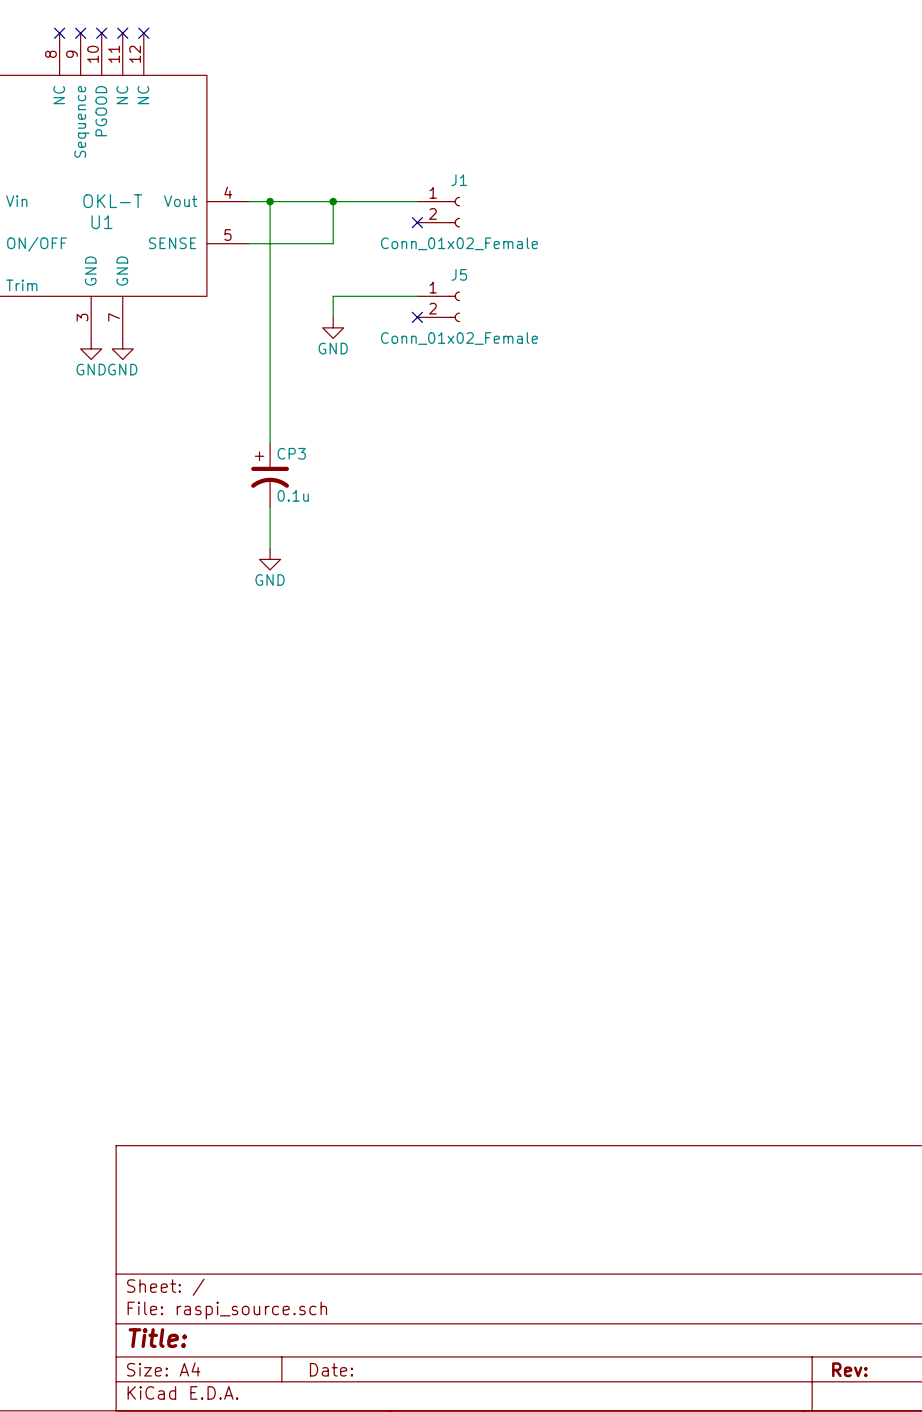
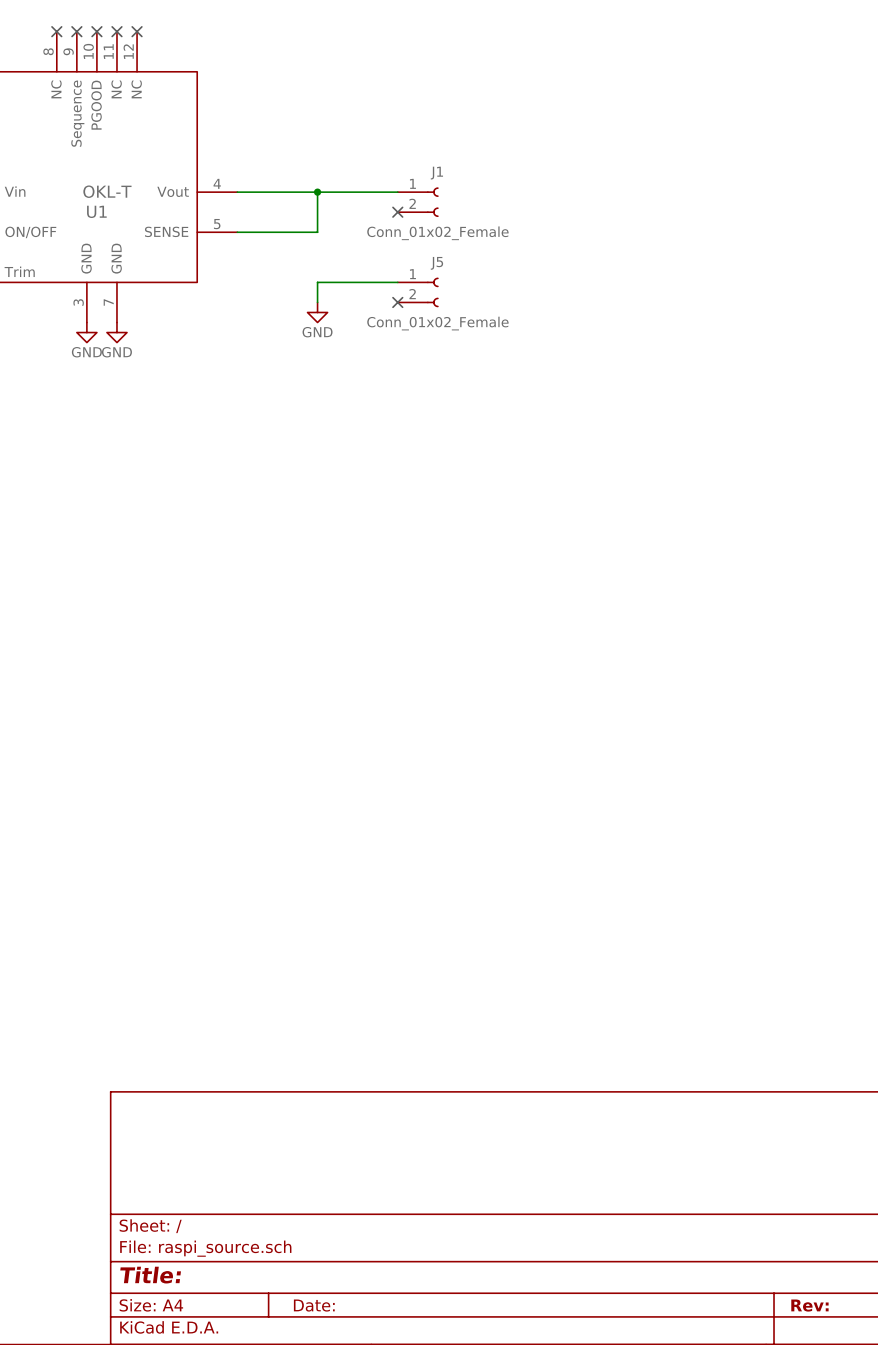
wire: (270, 201) (270, 443) -> none
junction: (270, 201) -> none
CP3: 0.1u (270, 475) -> none
wire: (270, 506) (270, 548) -> none
power symbol: GND (270, 559) -> none

